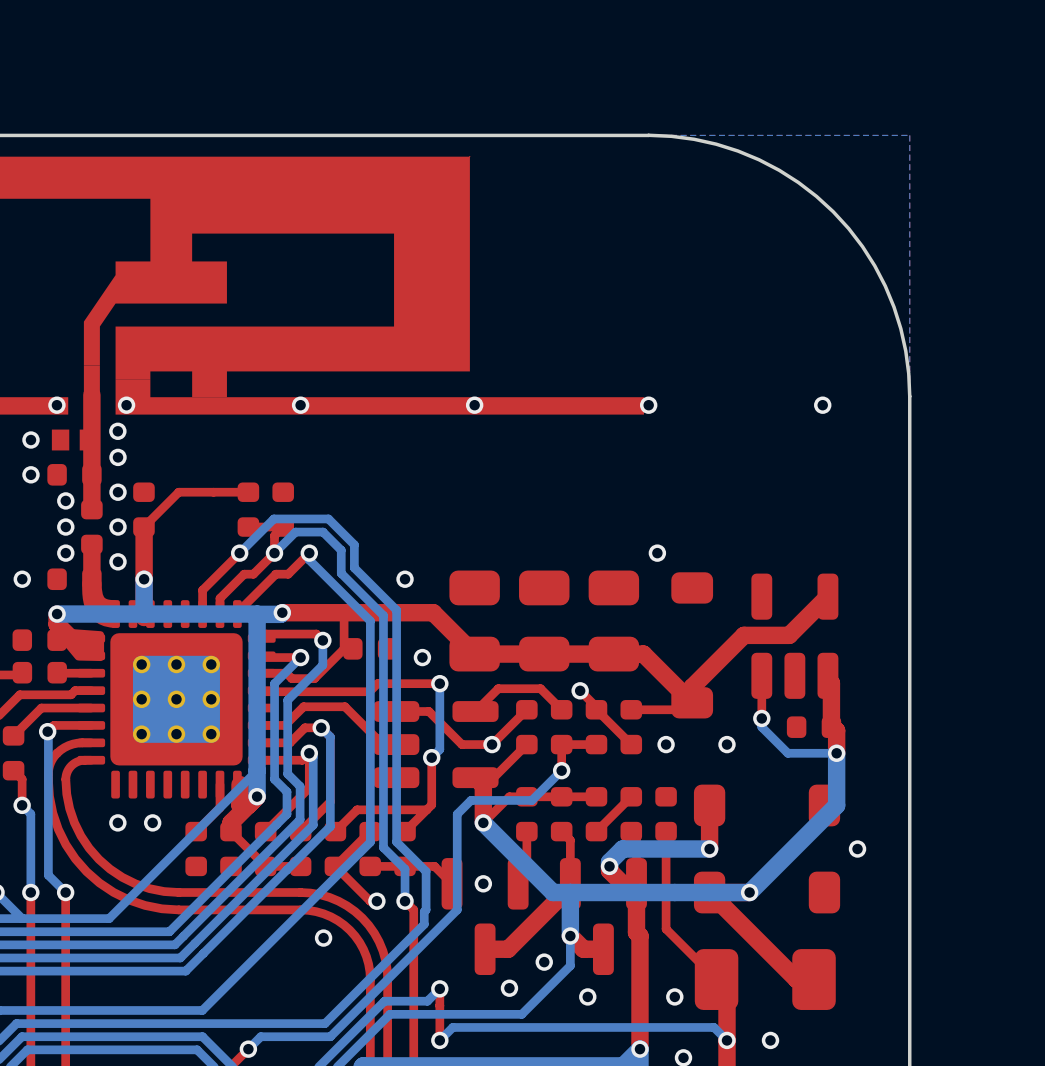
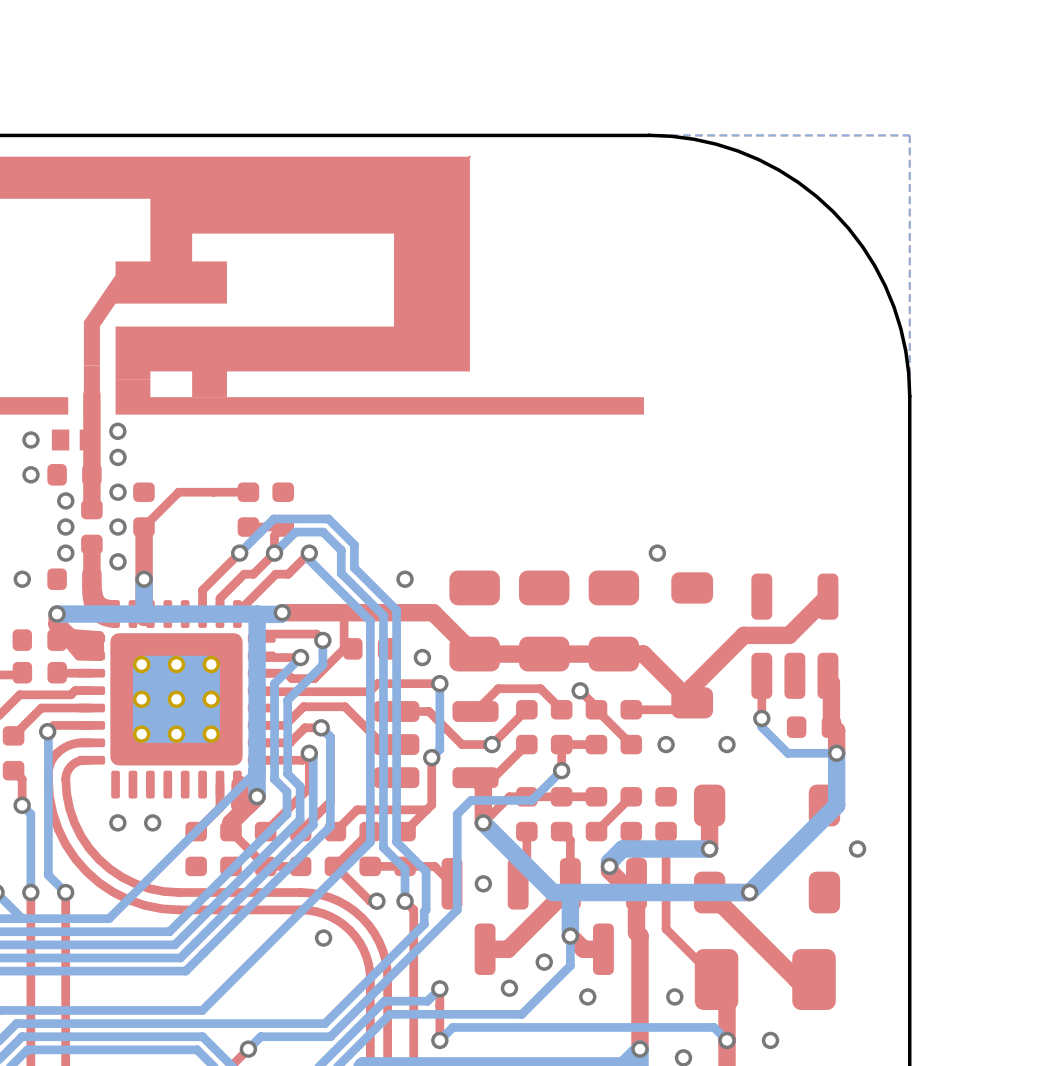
via: (56, 405) -> none
via: (126, 405) -> none
via: (300, 405) -> none
via: (474, 405) -> none
via: (648, 405) -> none
via: (822, 405) -> none

